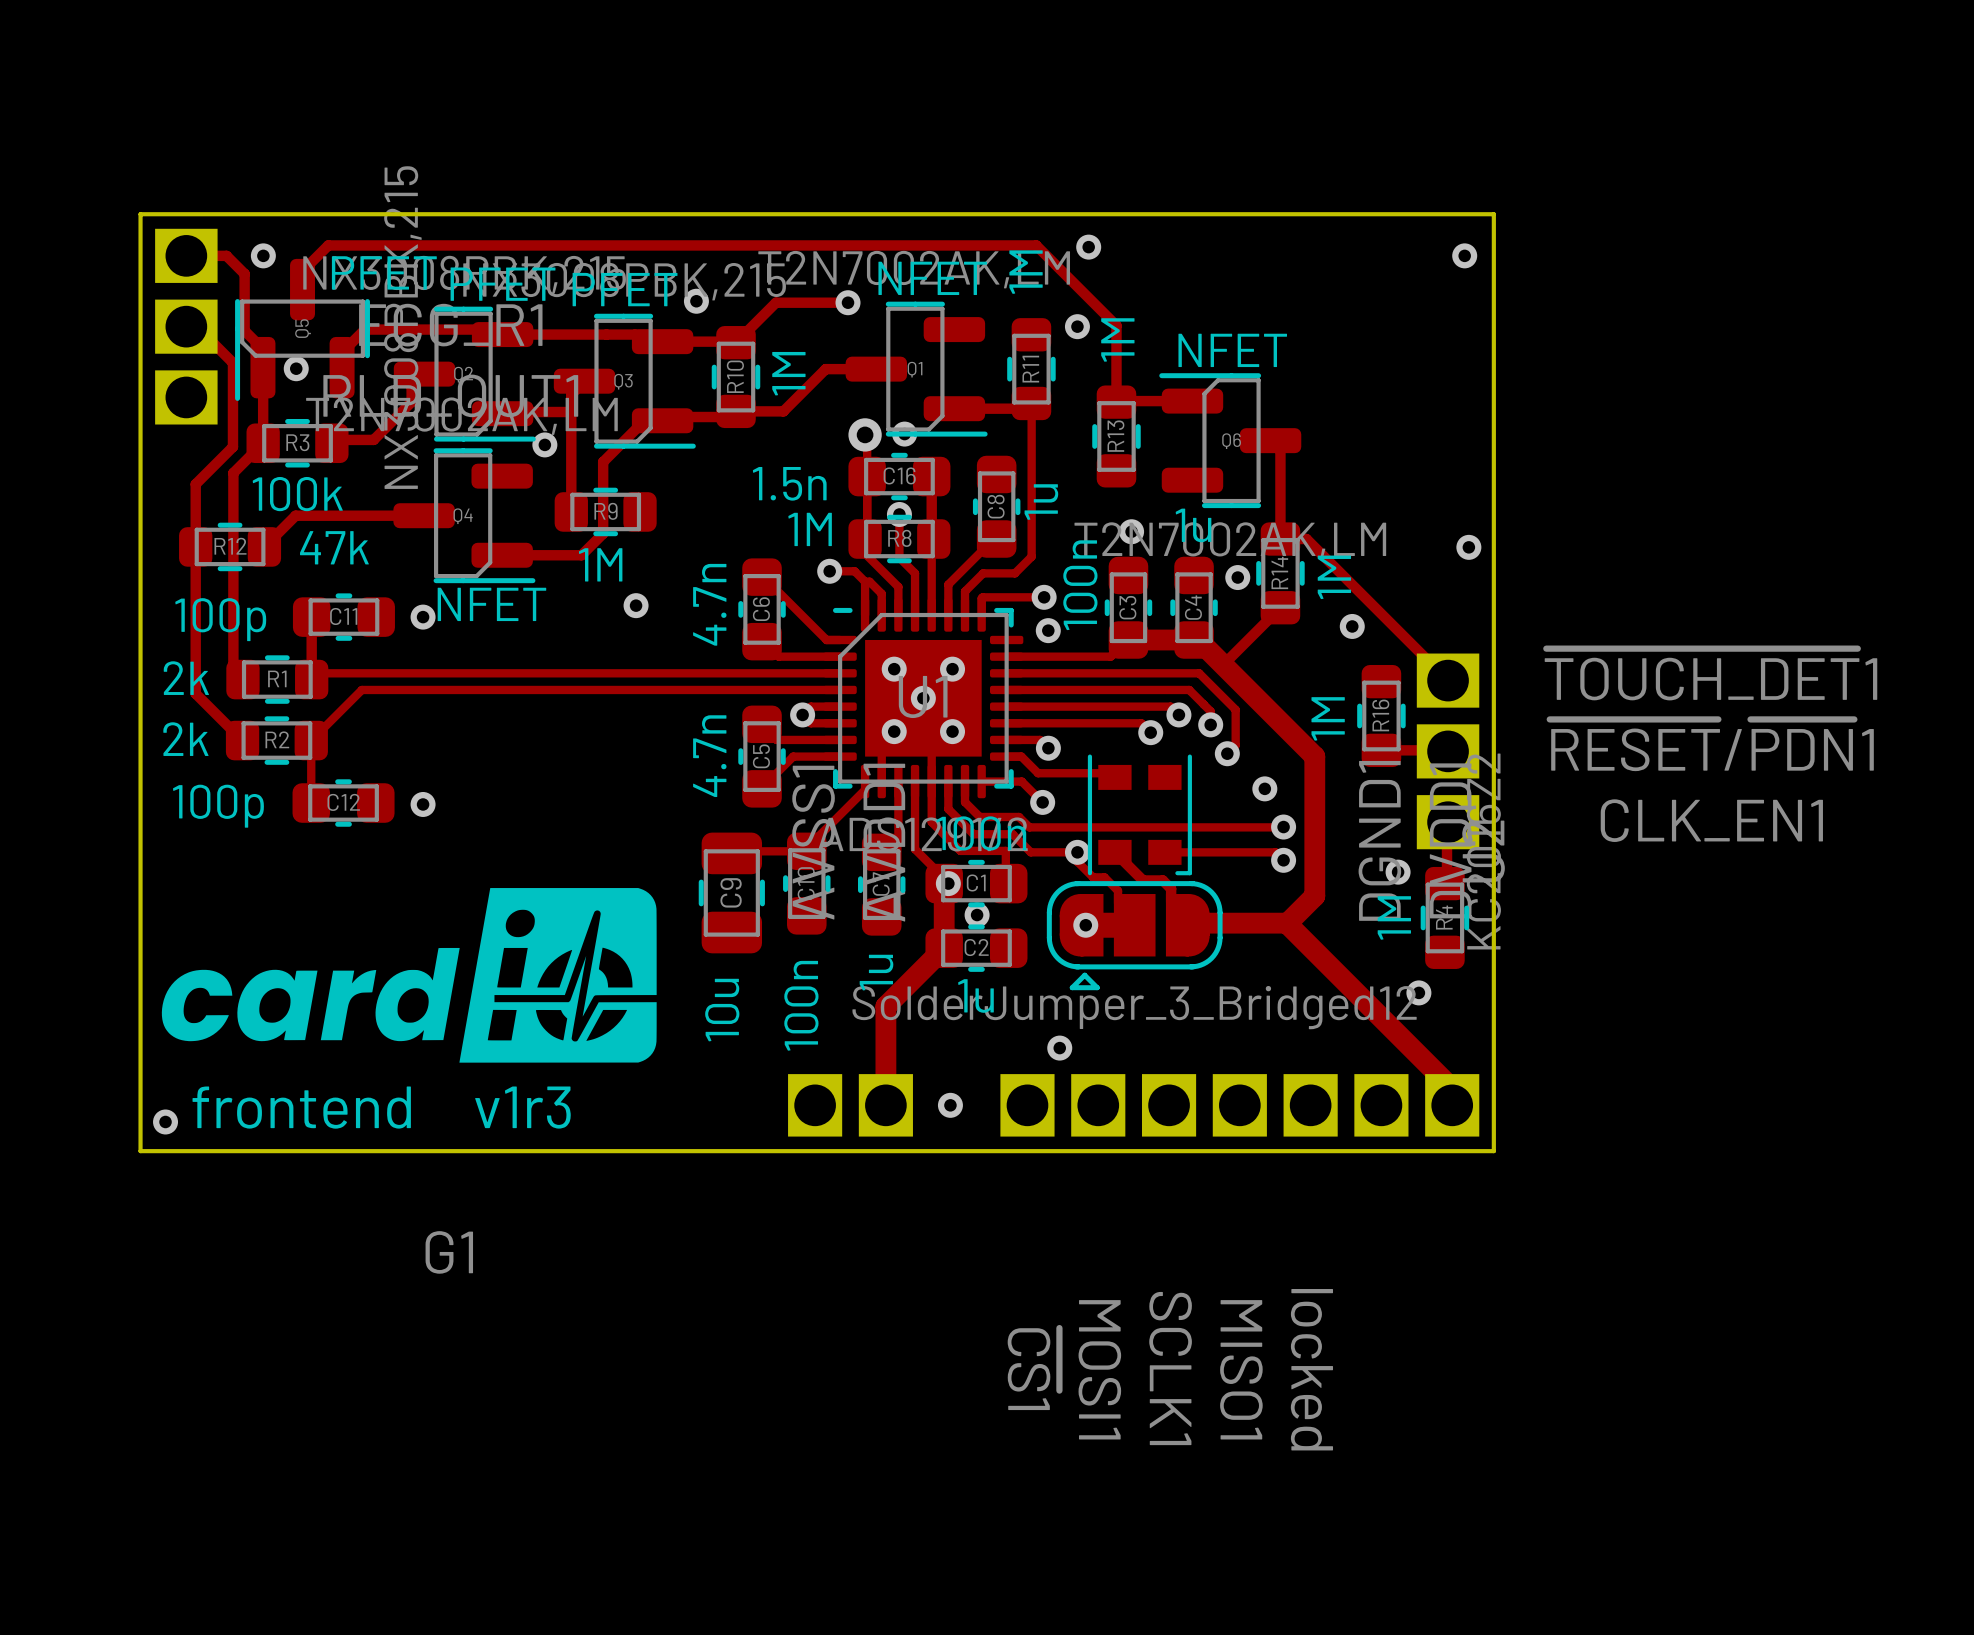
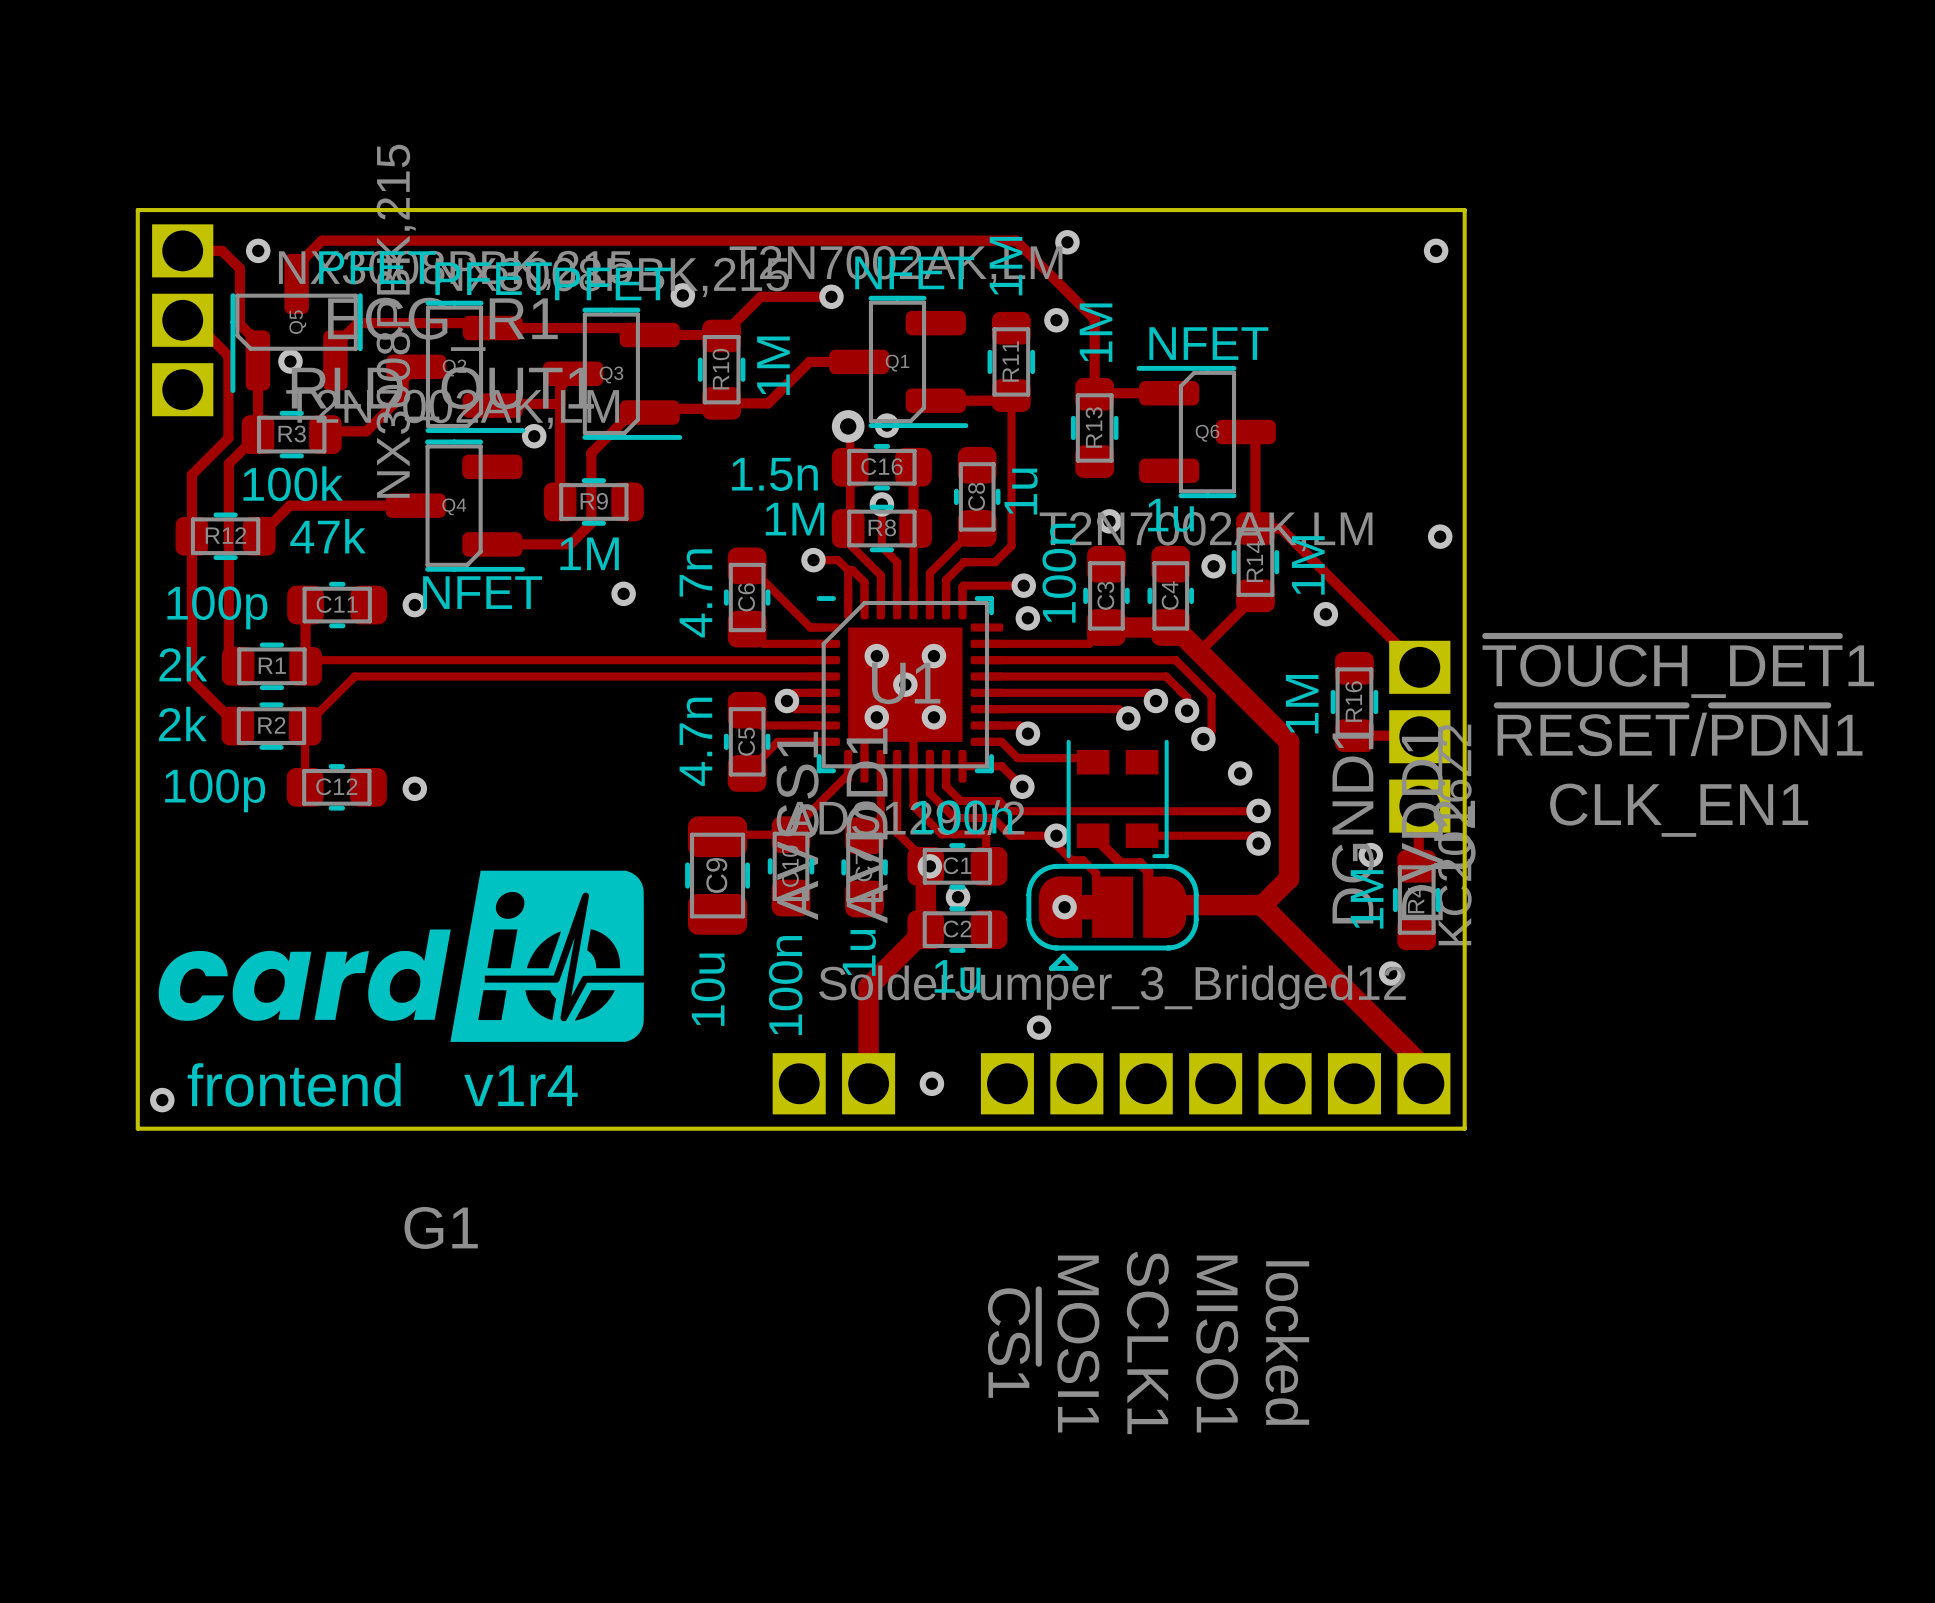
text: v1r3 (522, 1107) -> v1r4 (520, 1085)

